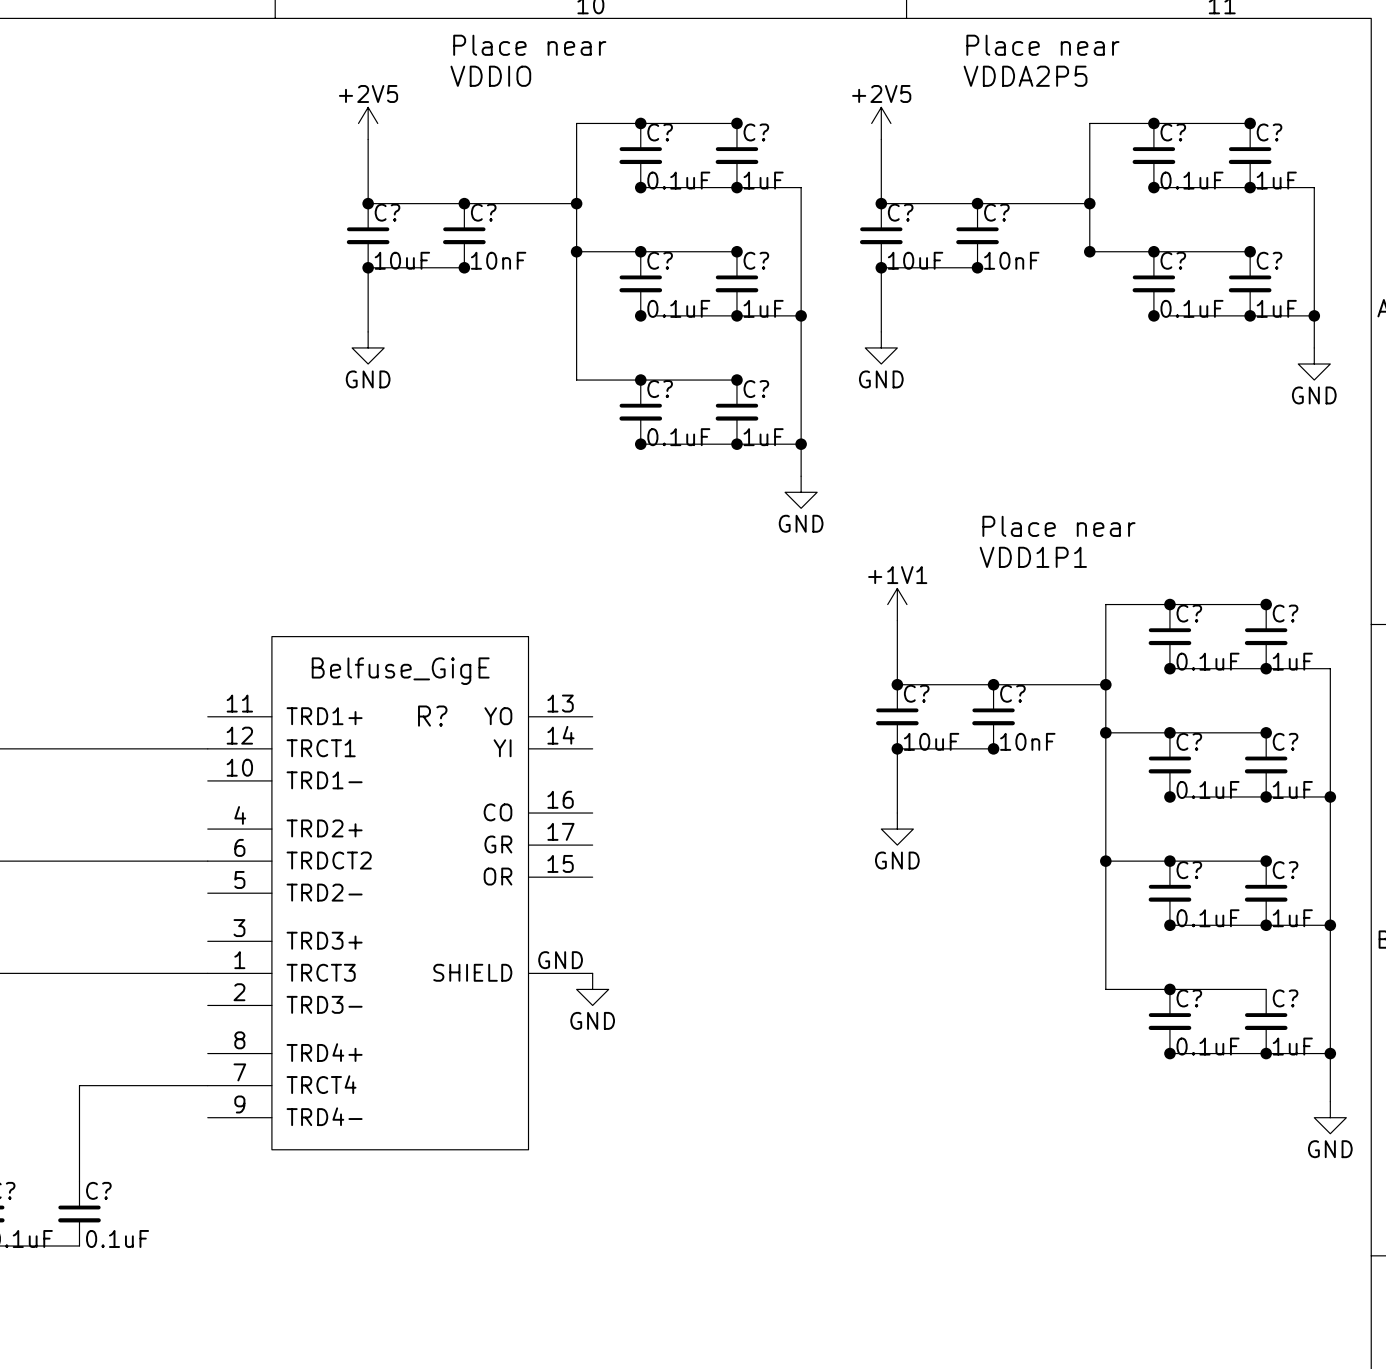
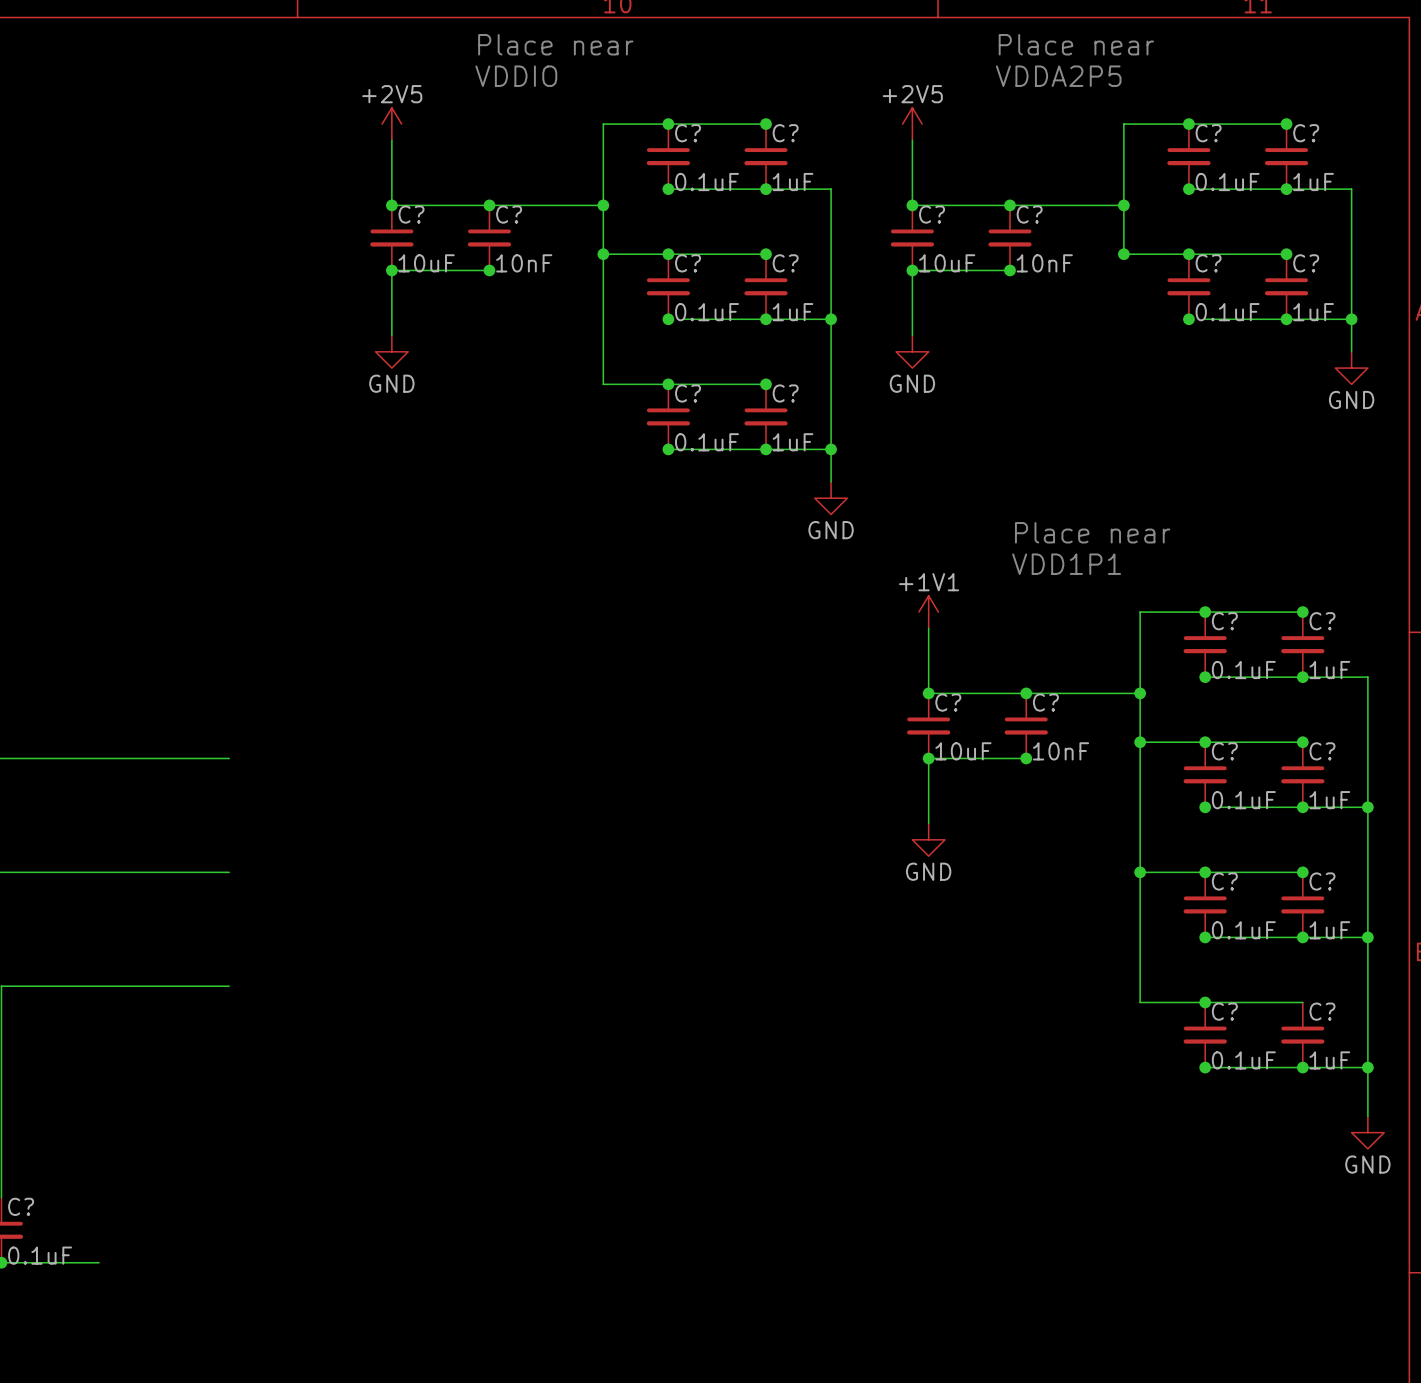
R?: Belfuse_GigE (400, 893) -> none
power symbol: GND (592, 989) -> none
wire: (207, 1085) (79, 1085) (79, 1181) -> none
C?: 0.1uF (79, 1213) -> none

